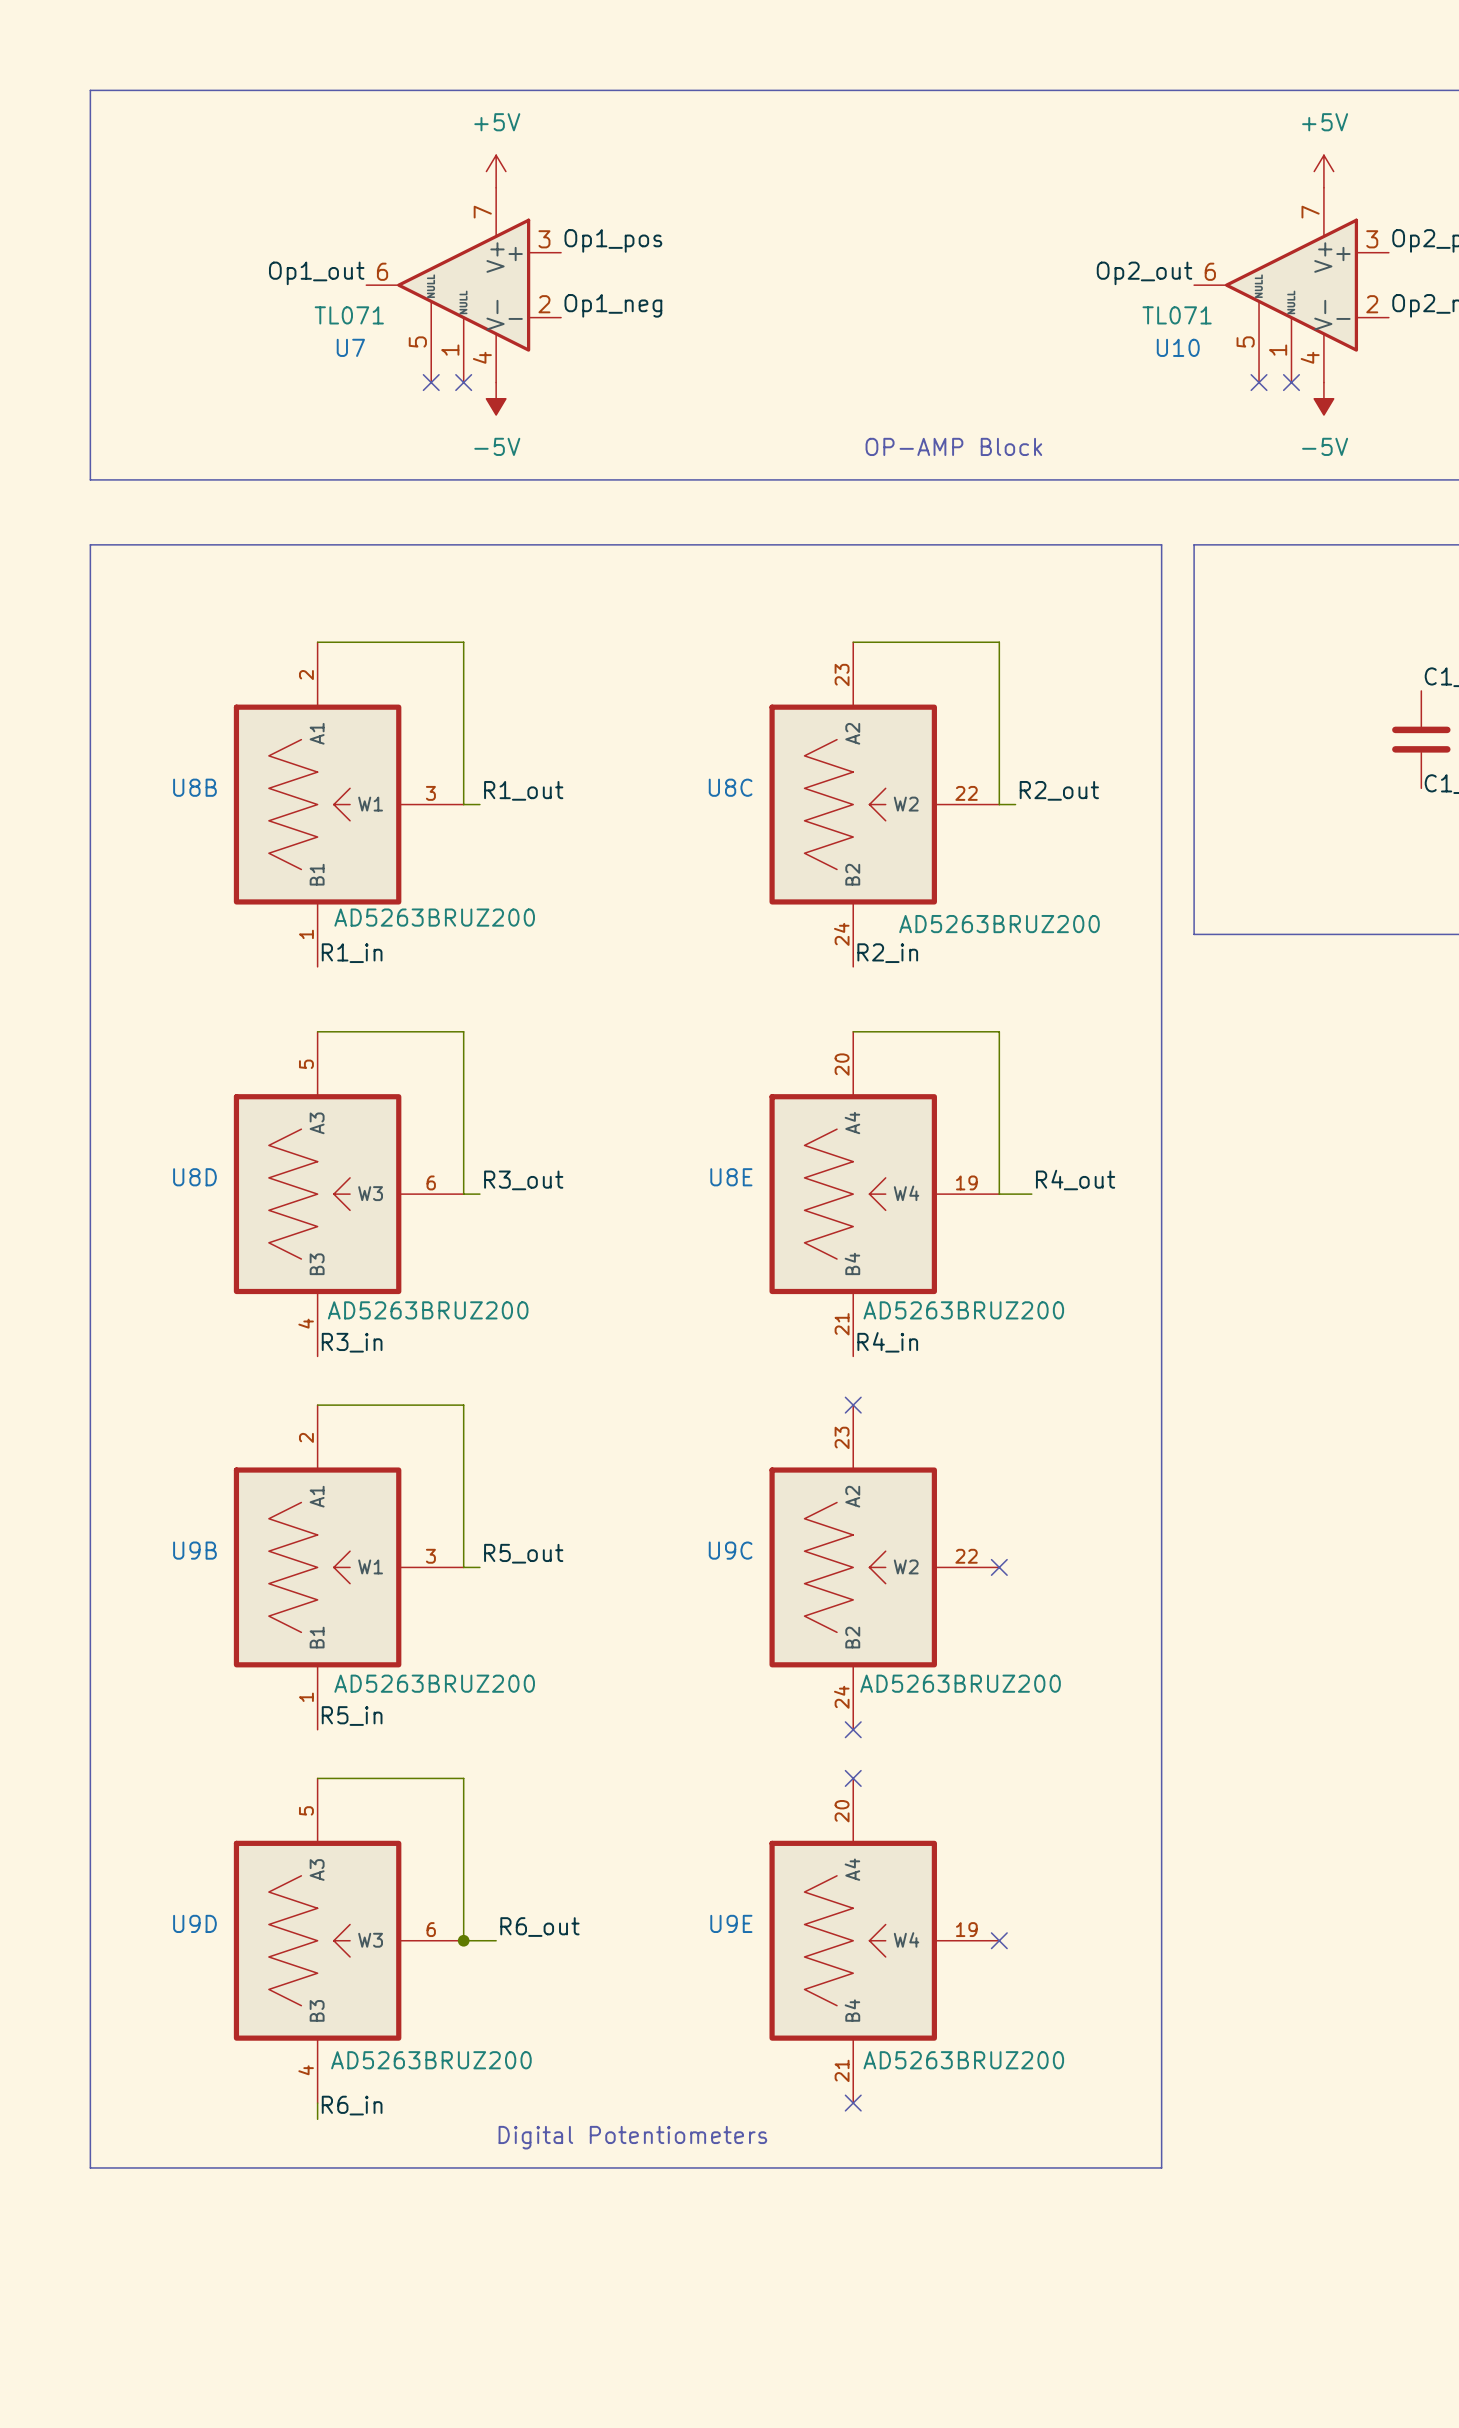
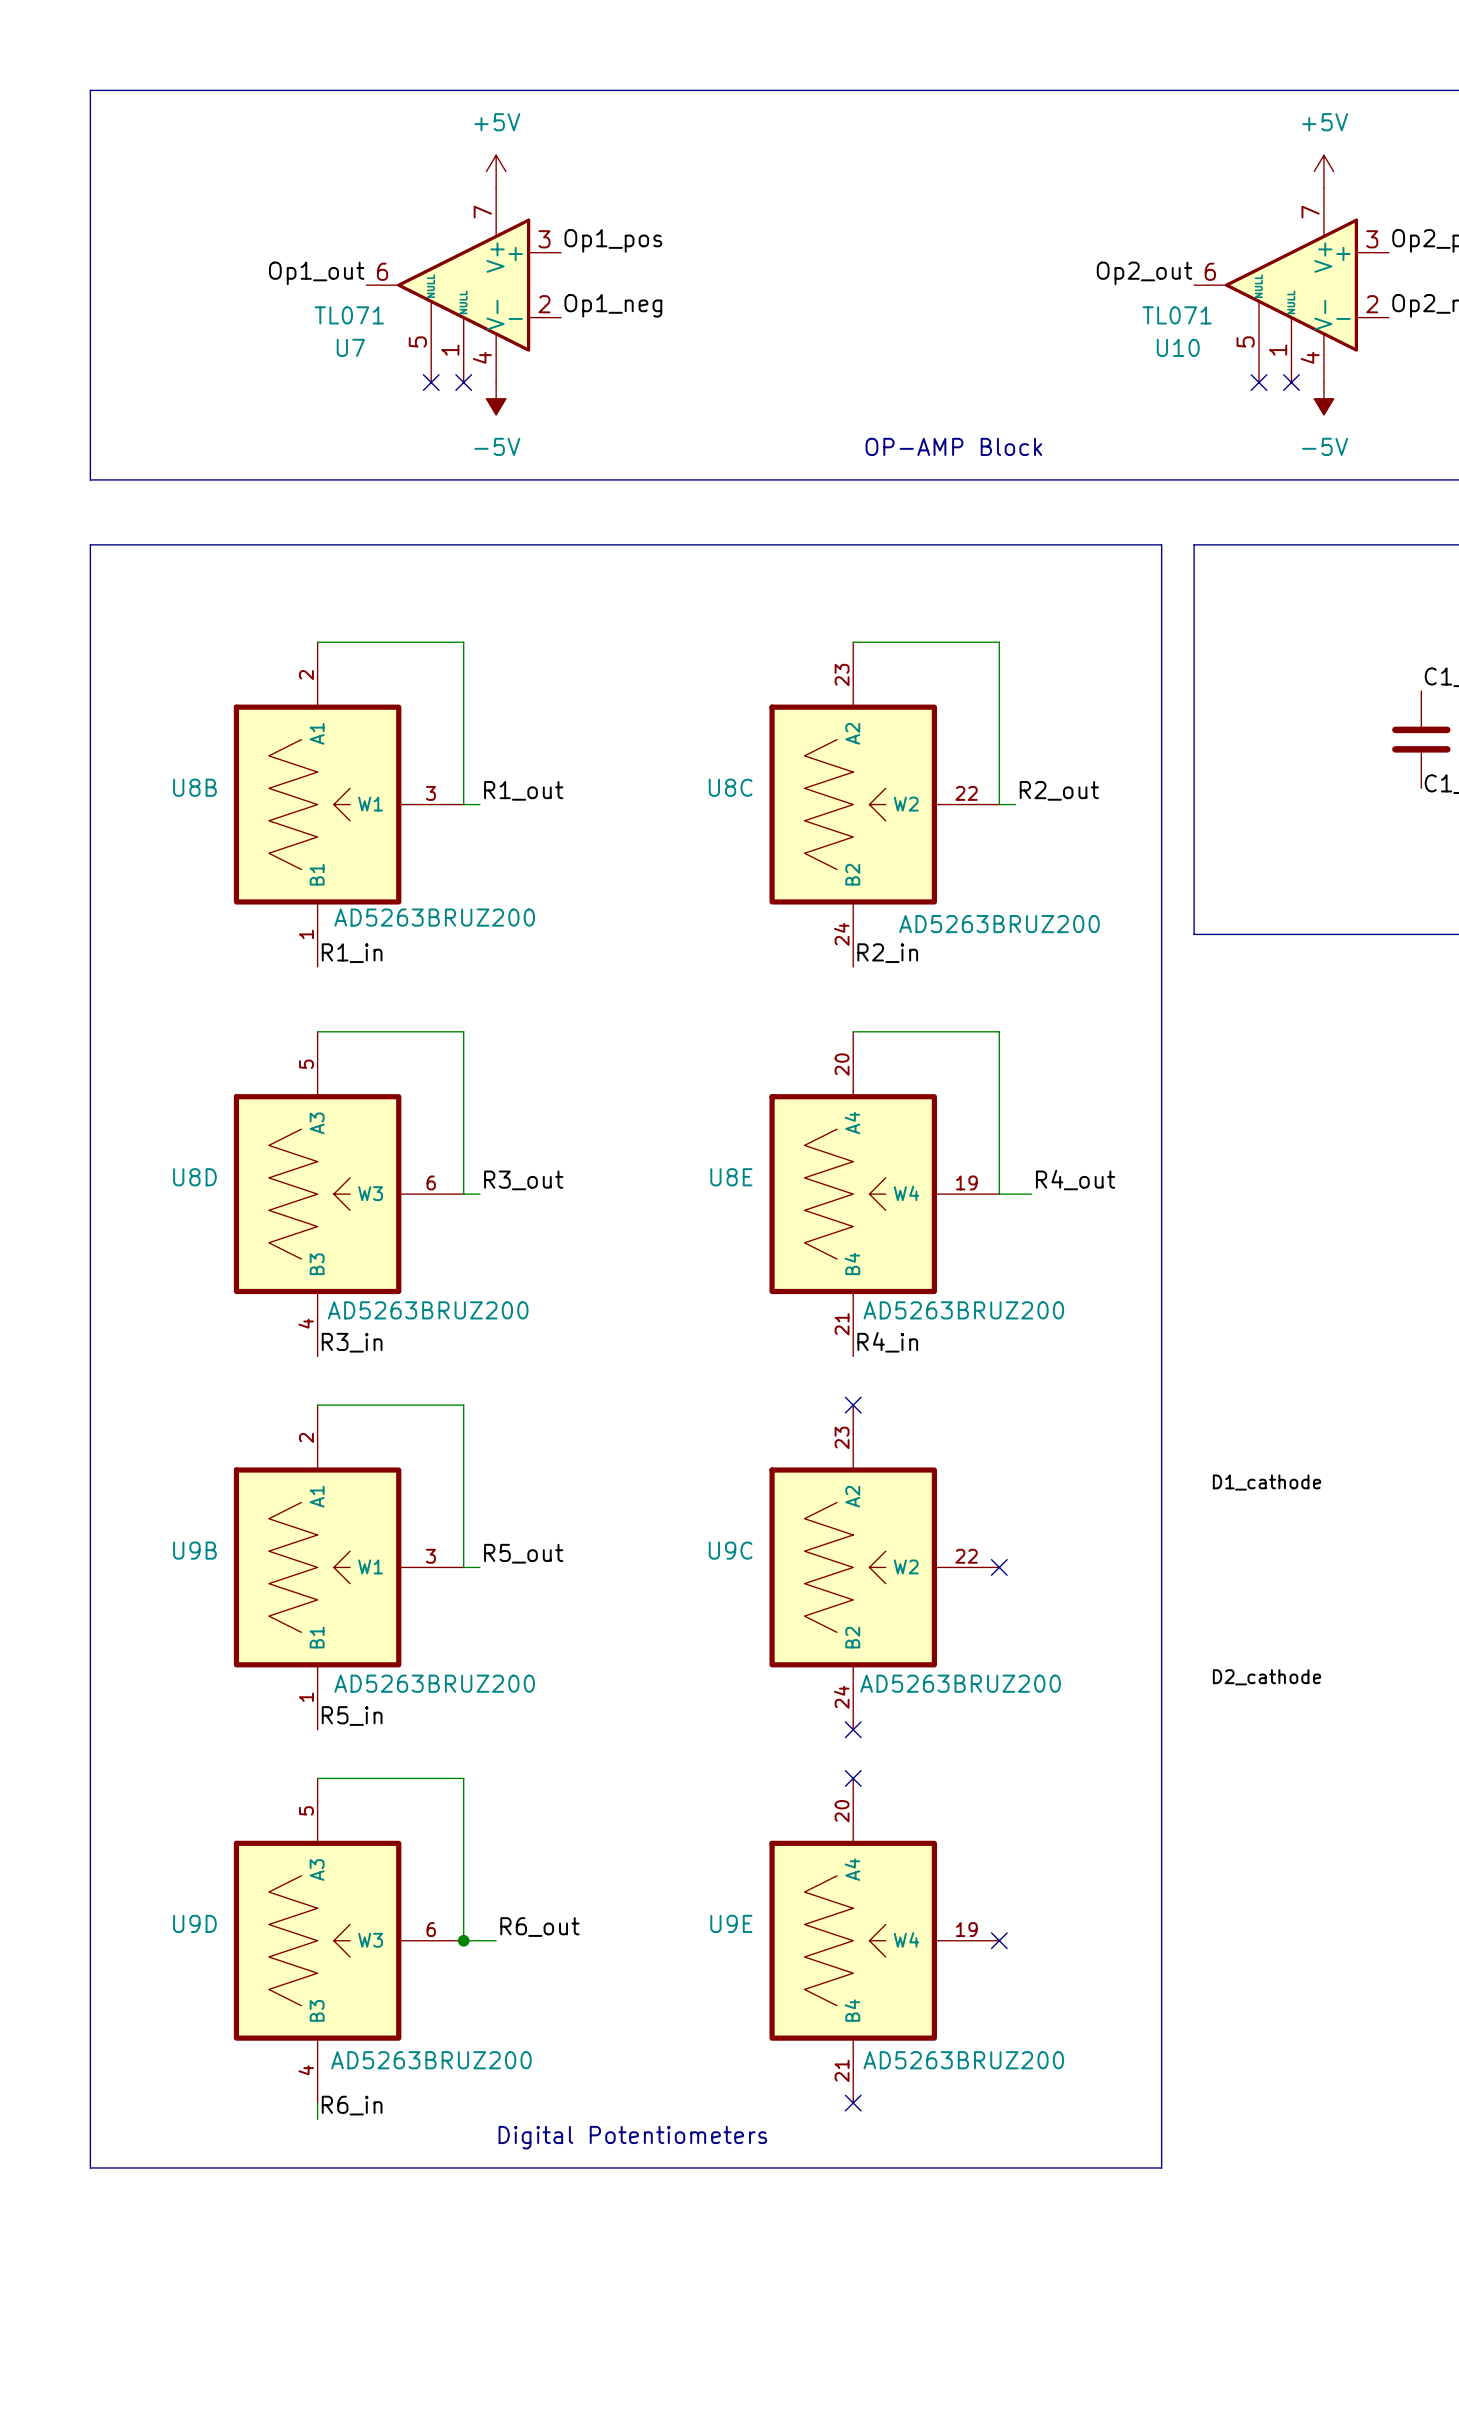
label: none -> D1_cathode (1267, 1482)
label: none -> D2_cathode (1267, 1677)

